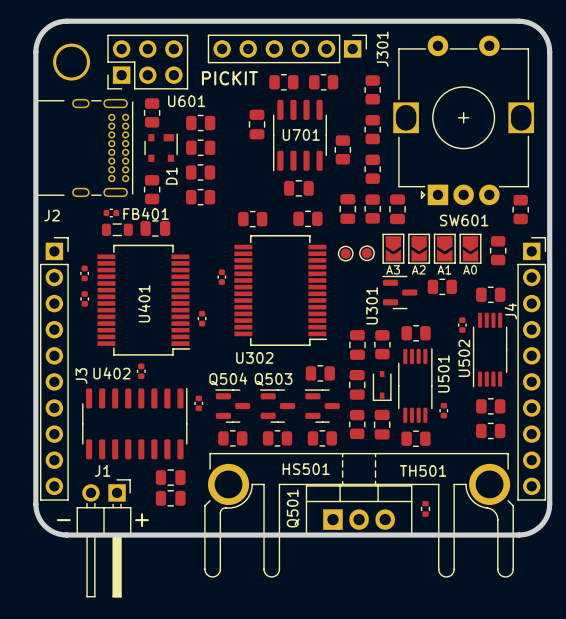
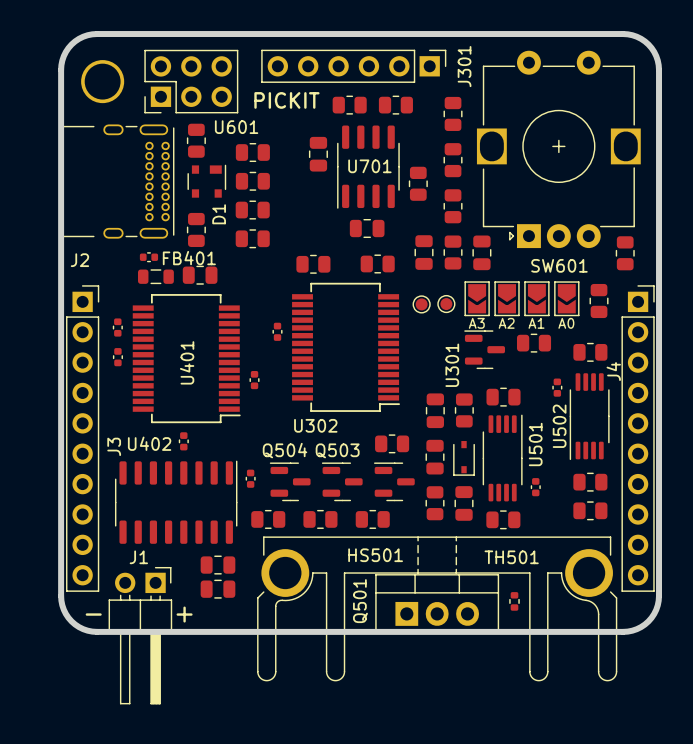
part: none -> (268, 519)
part: (232, 438) -> none
part: none -> (320, 519)
part: (277, 438) -> none
part: none -> (372, 519)
part: (322, 438) -> none

